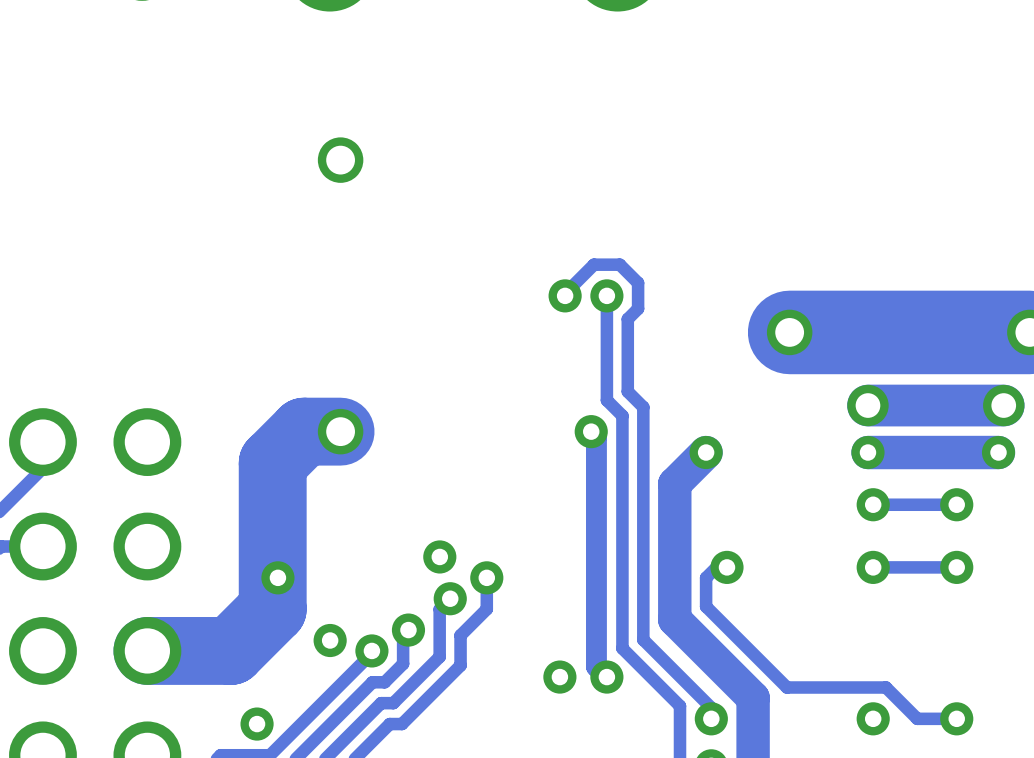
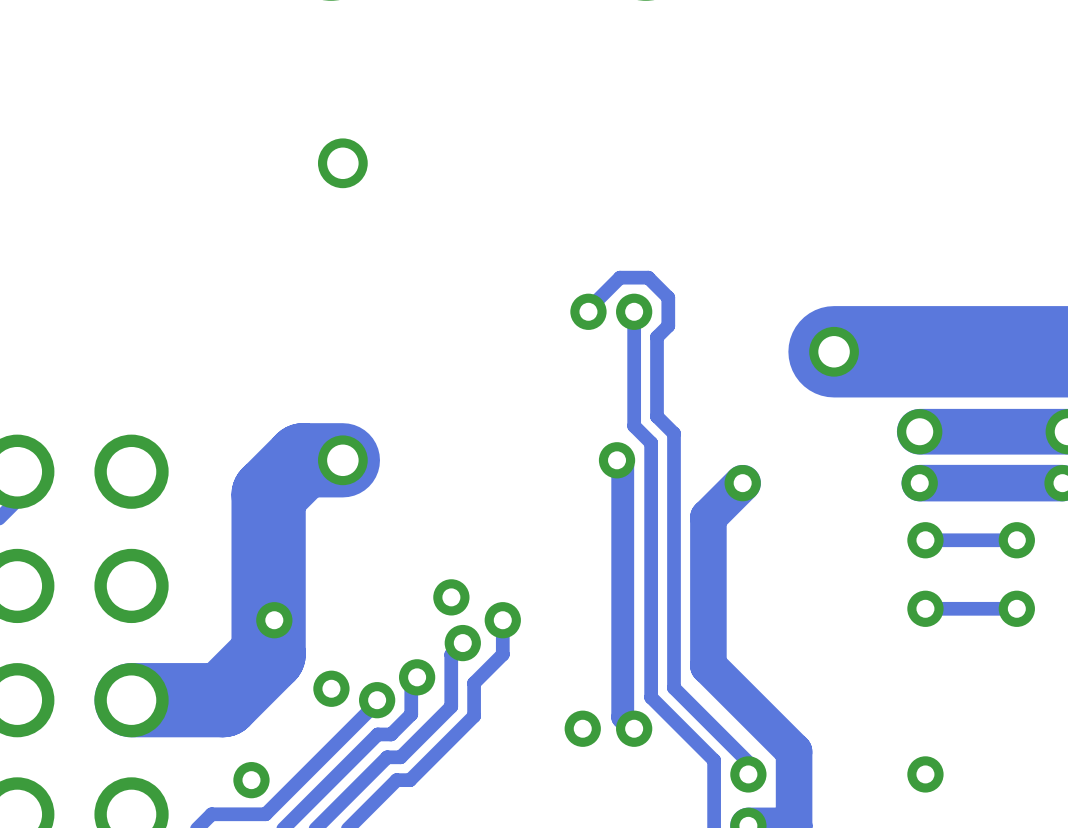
track: (726, 567) (716, 567) (706, 577) (706, 606) (786, 687) (885, 687) (917, 718) (956, 718) -> none
via: (726, 567) -> none
via: (956, 718) -> none

